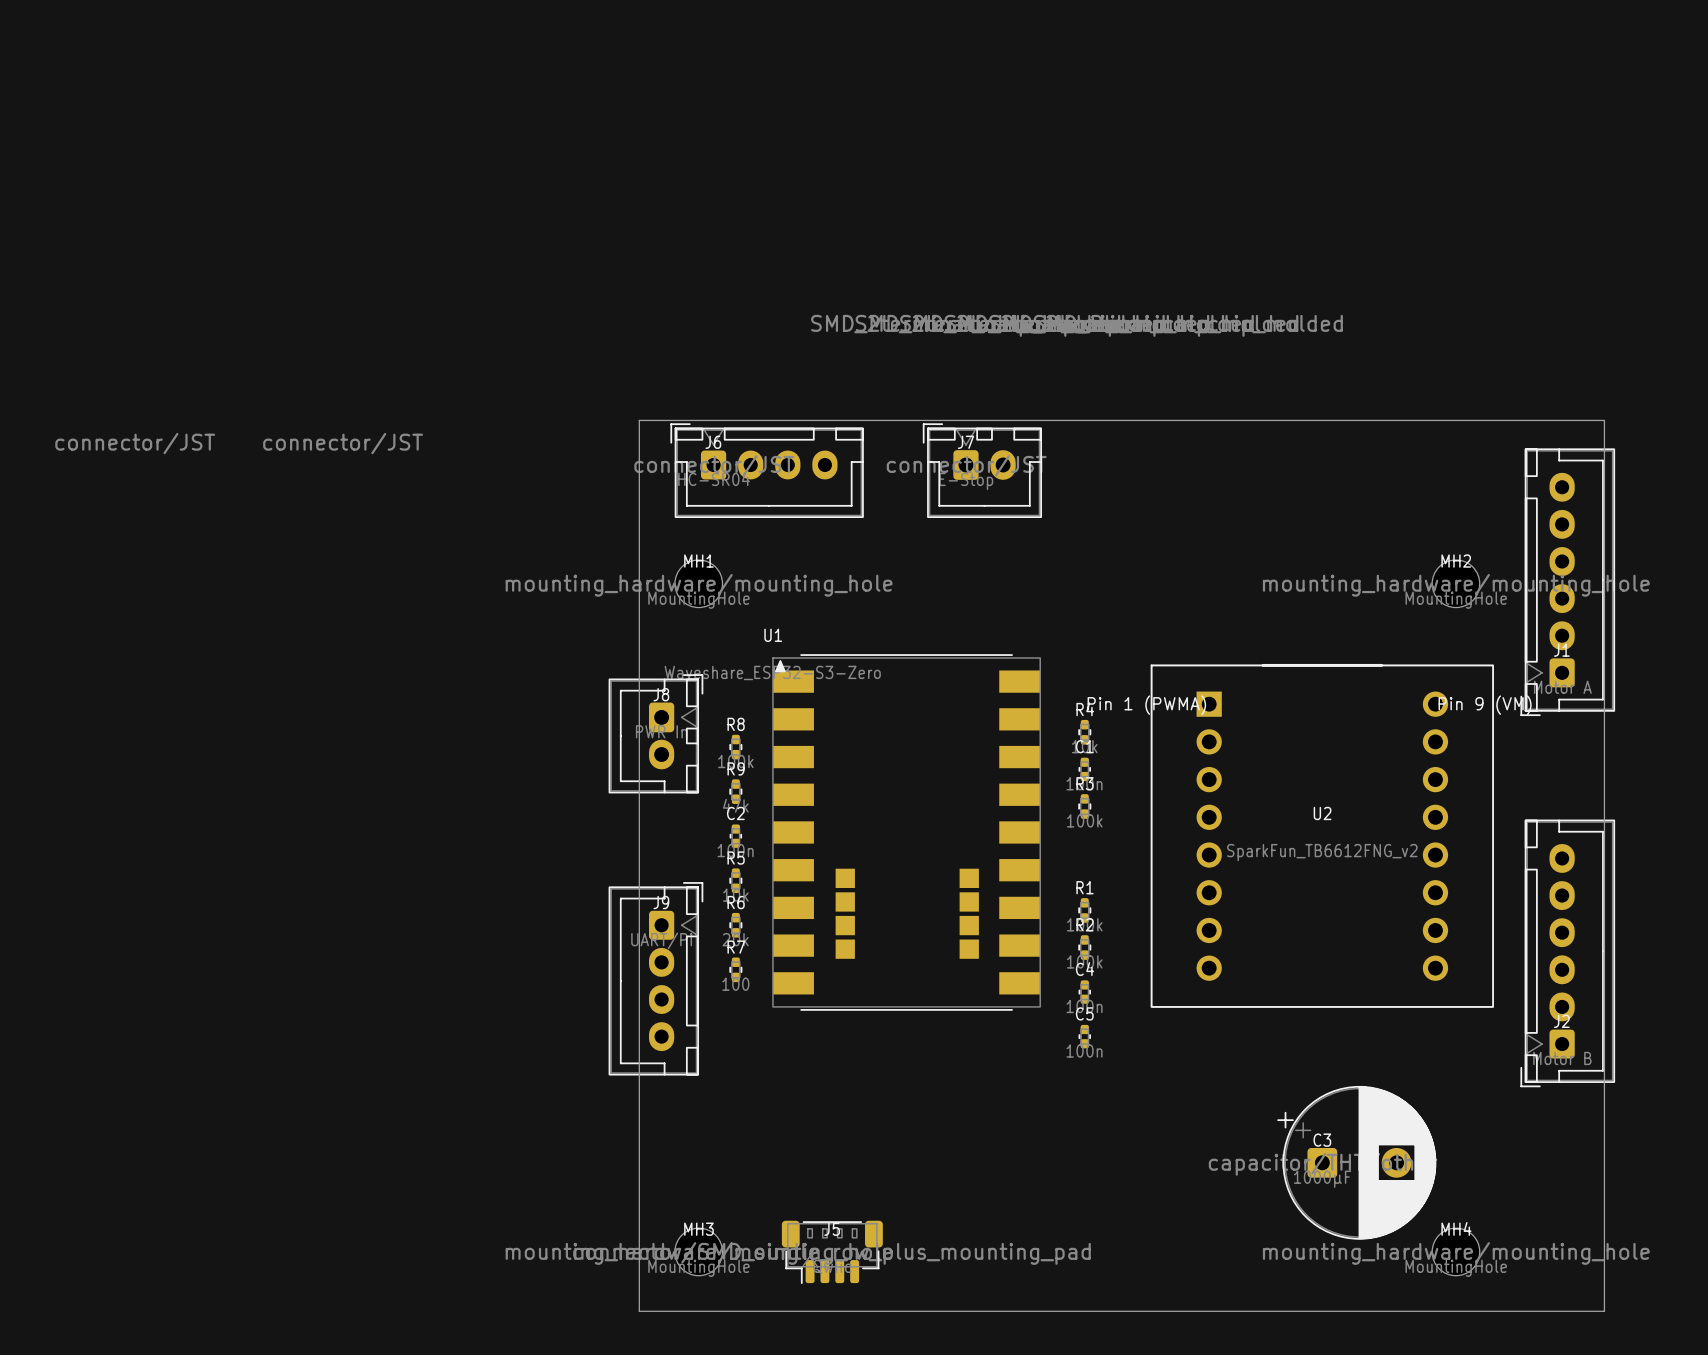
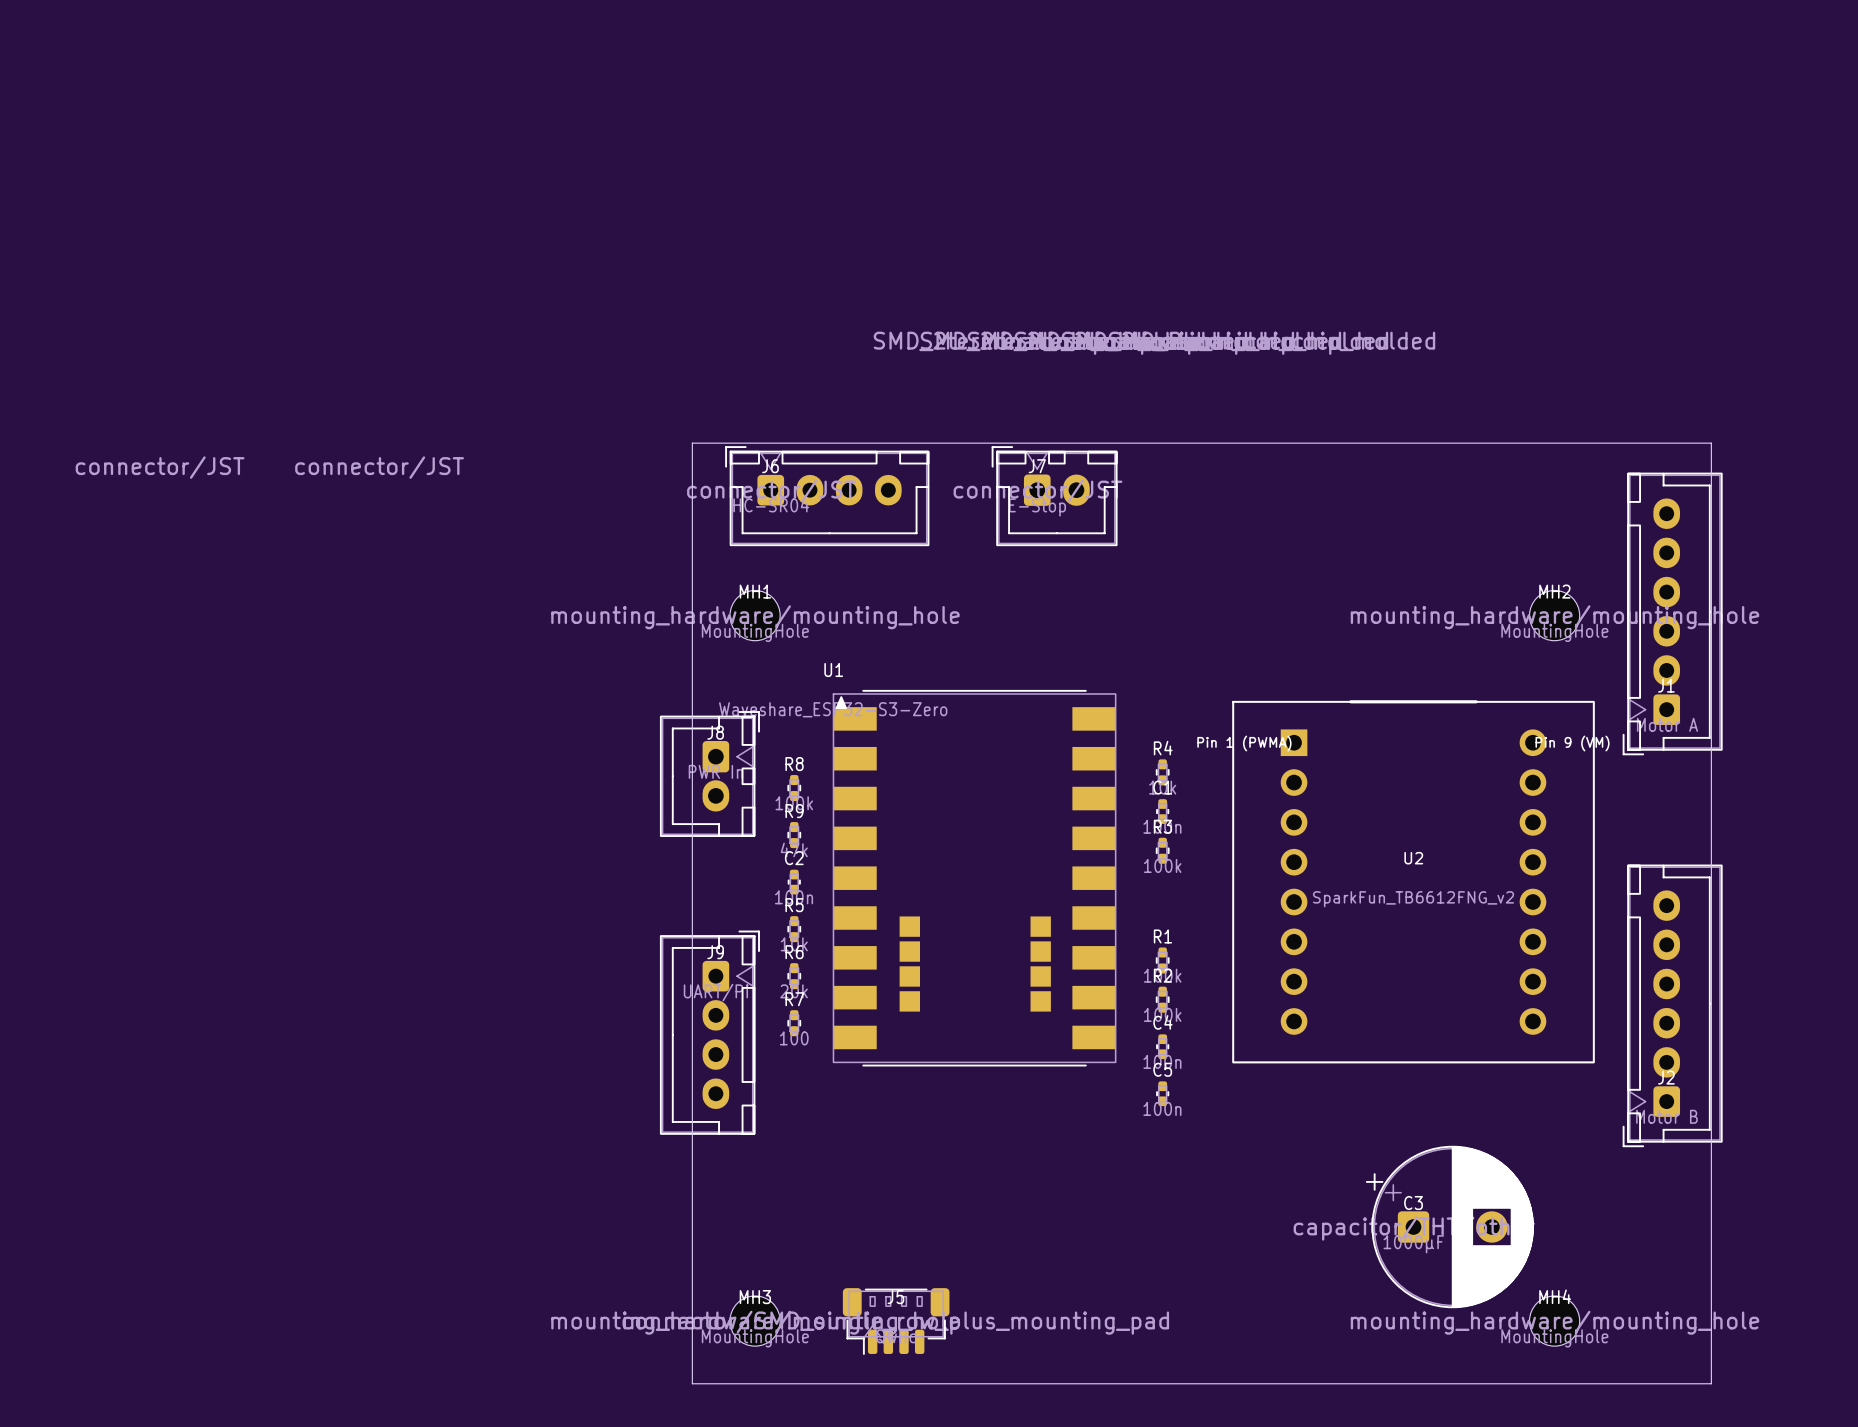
U2 footprint: [1150, 663, 1494, 1008] -> [1232, 700, 1595, 1064]

